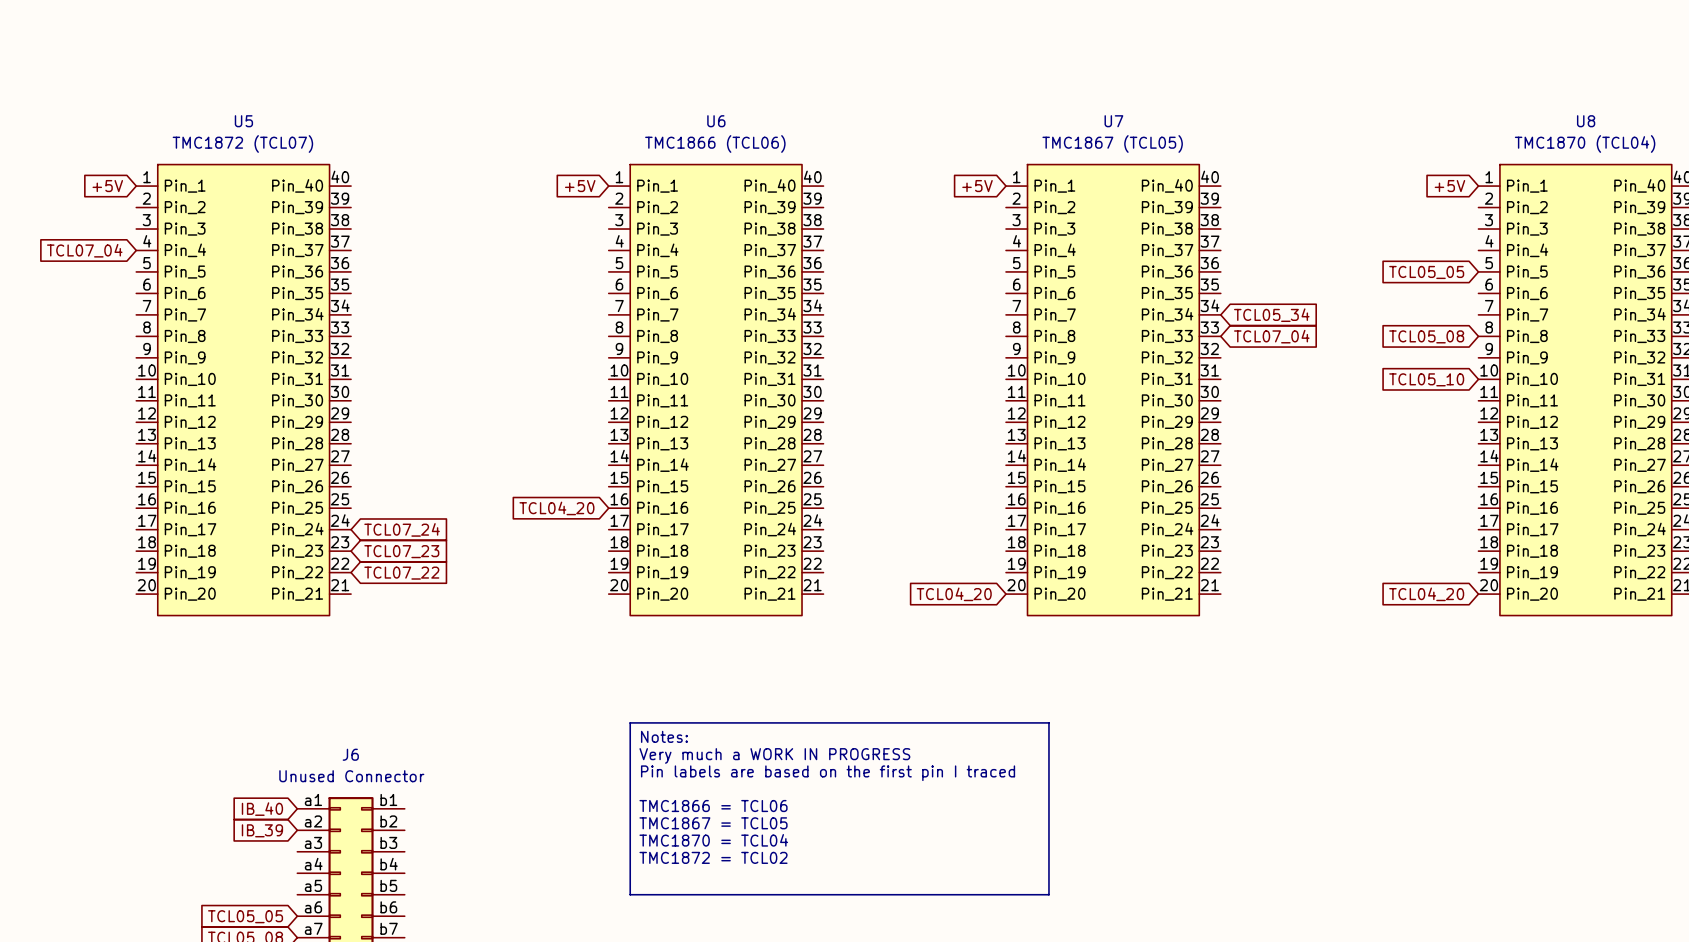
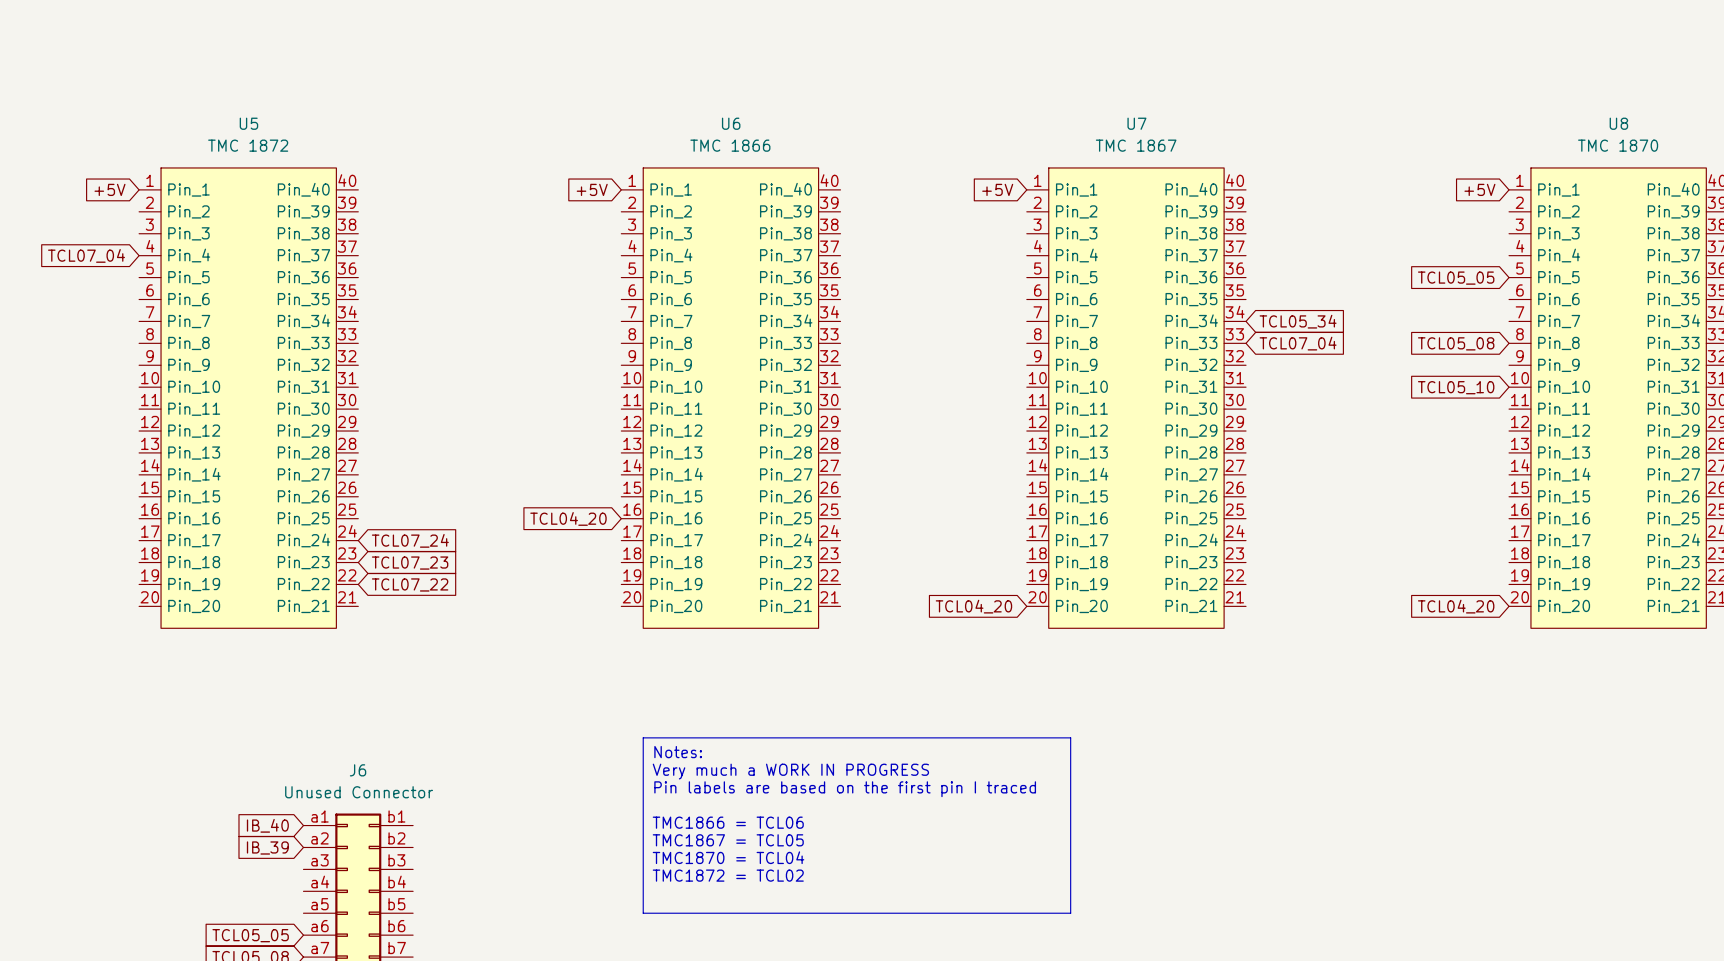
U5 value: TMC1872 (TCL07) (242, 143) -> TMC 1872 (248, 145)
U6 value: TMC1866 (TCL06) (715, 143) -> TMC 1866 (730, 145)
U7 value: TMC1867 (TCL05) (1112, 143) -> TMC 1867 (1136, 145)
U8 value: TMC1870 (TCL04) (1585, 143) -> TMC 1870 (1618, 145)

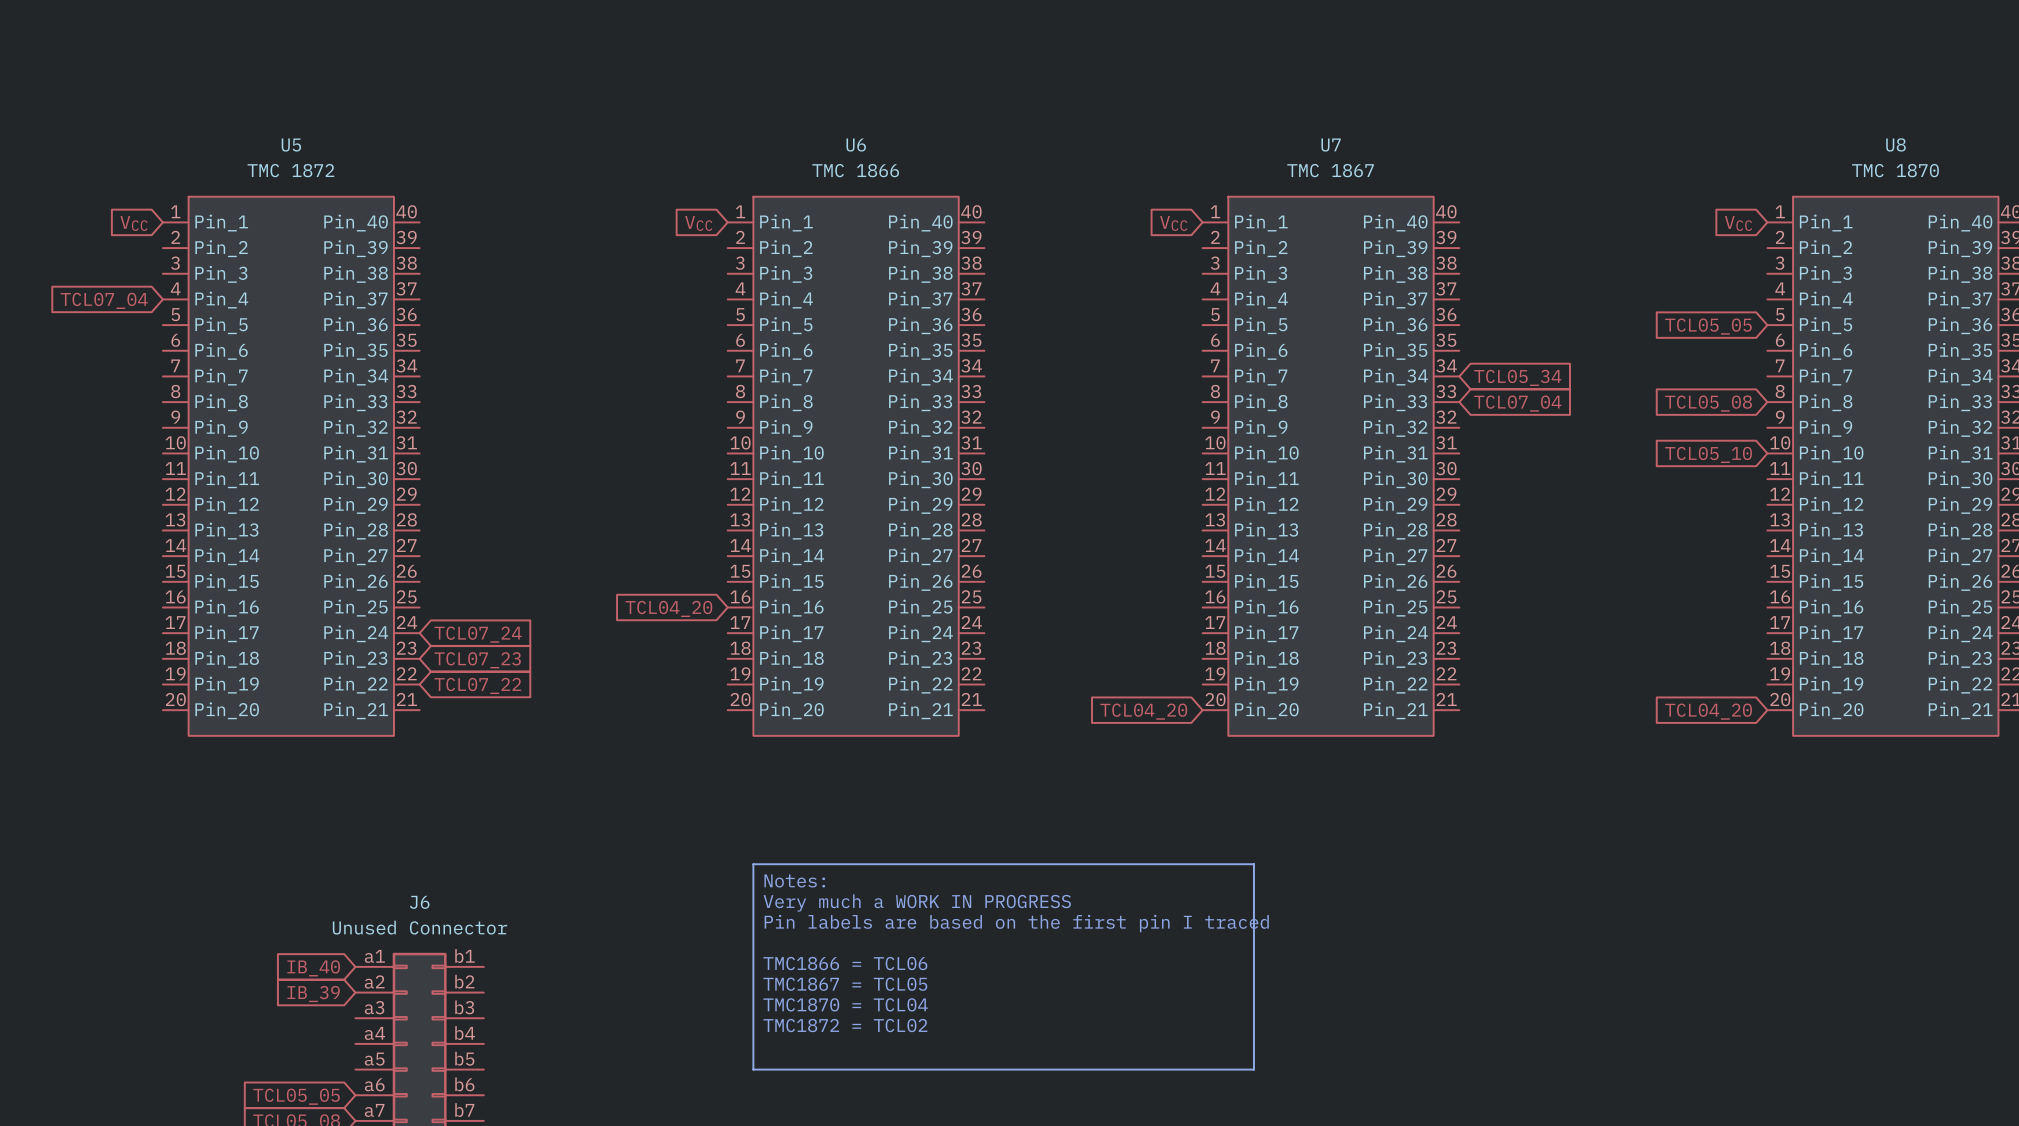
global label: +5V (109, 189) -> VCC (134, 223)
global label: +5V (592, 189) -> VCC (698, 223)
global label: +5V (997, 189) -> VCC (1173, 223)
global label: +5V (1479, 189) -> VCC (1738, 223)

